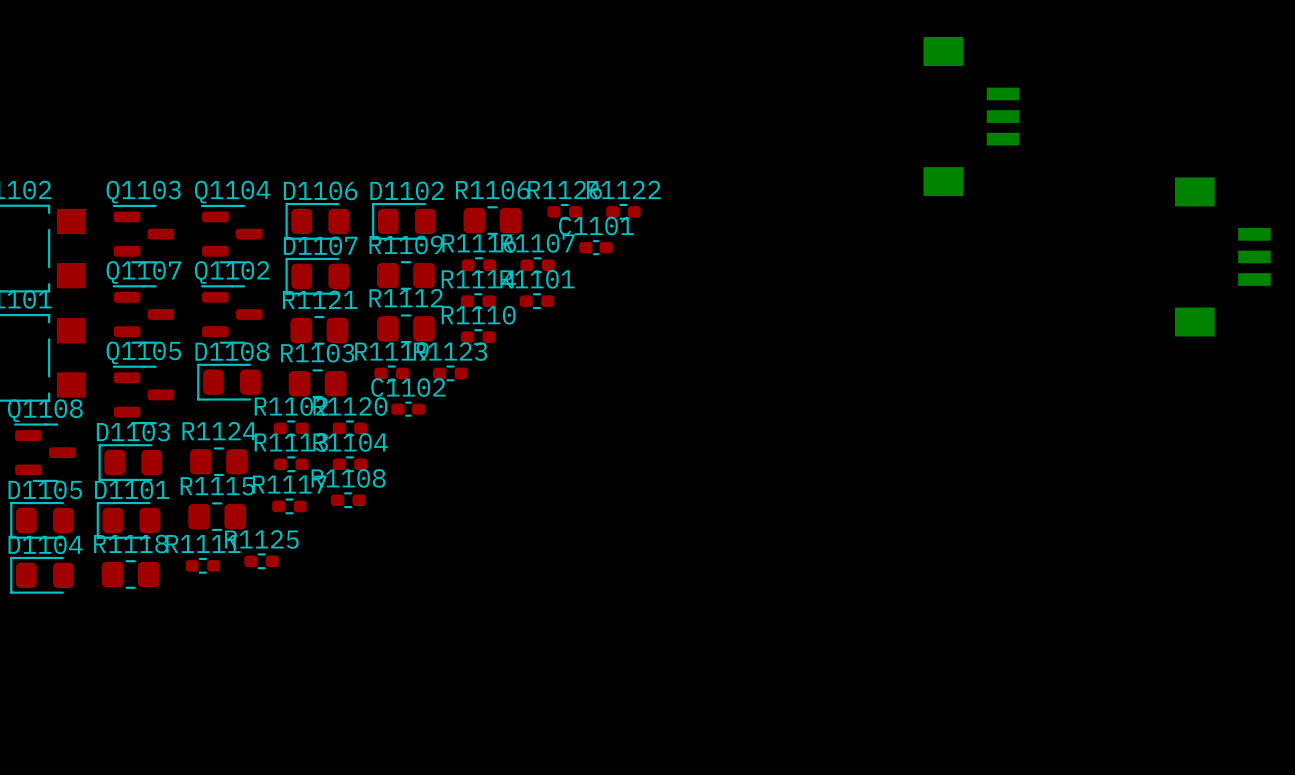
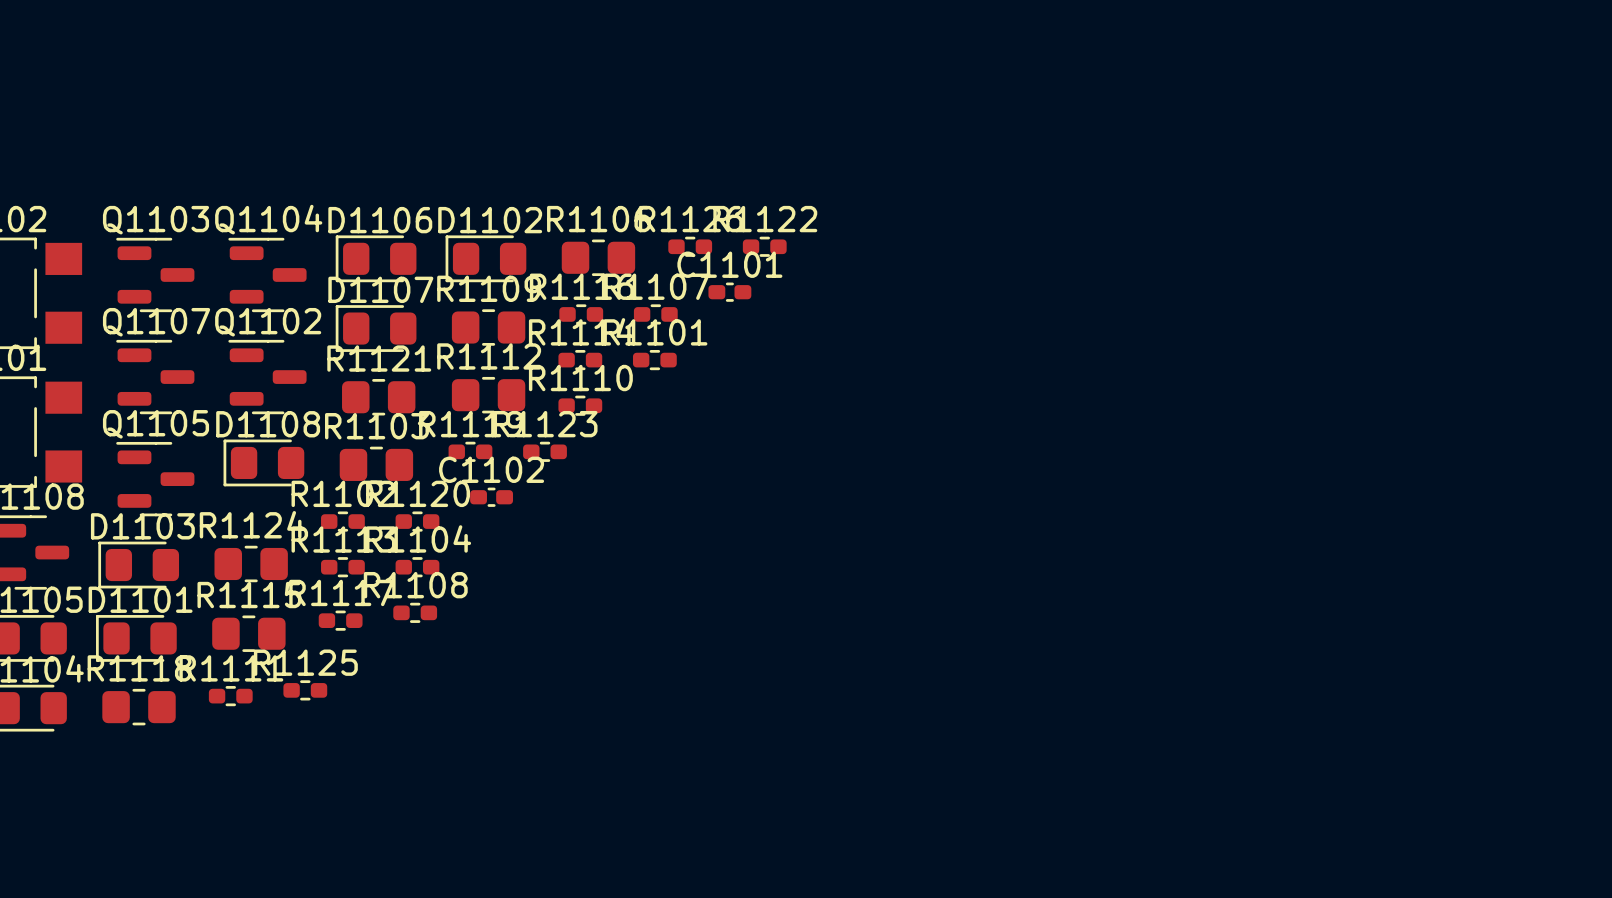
part: (971, 116) -> none
part: (1222, 256) -> none

